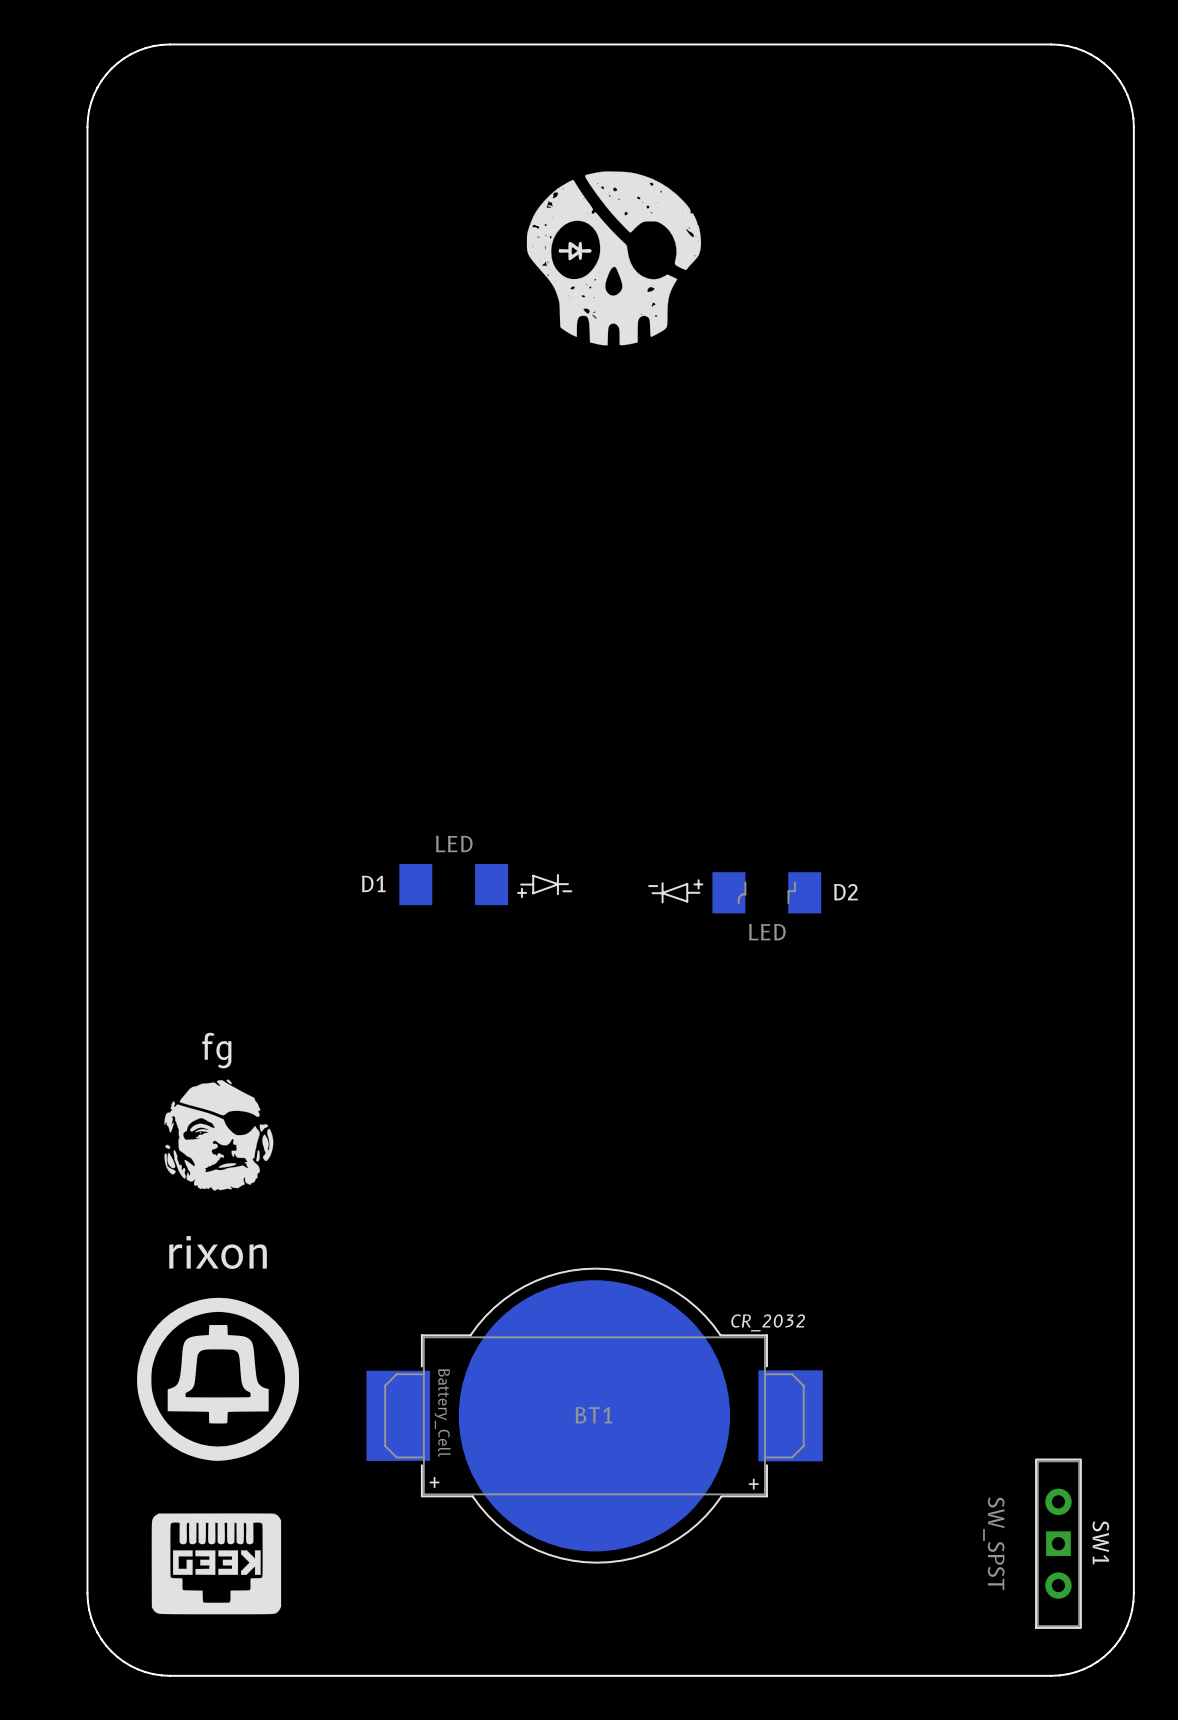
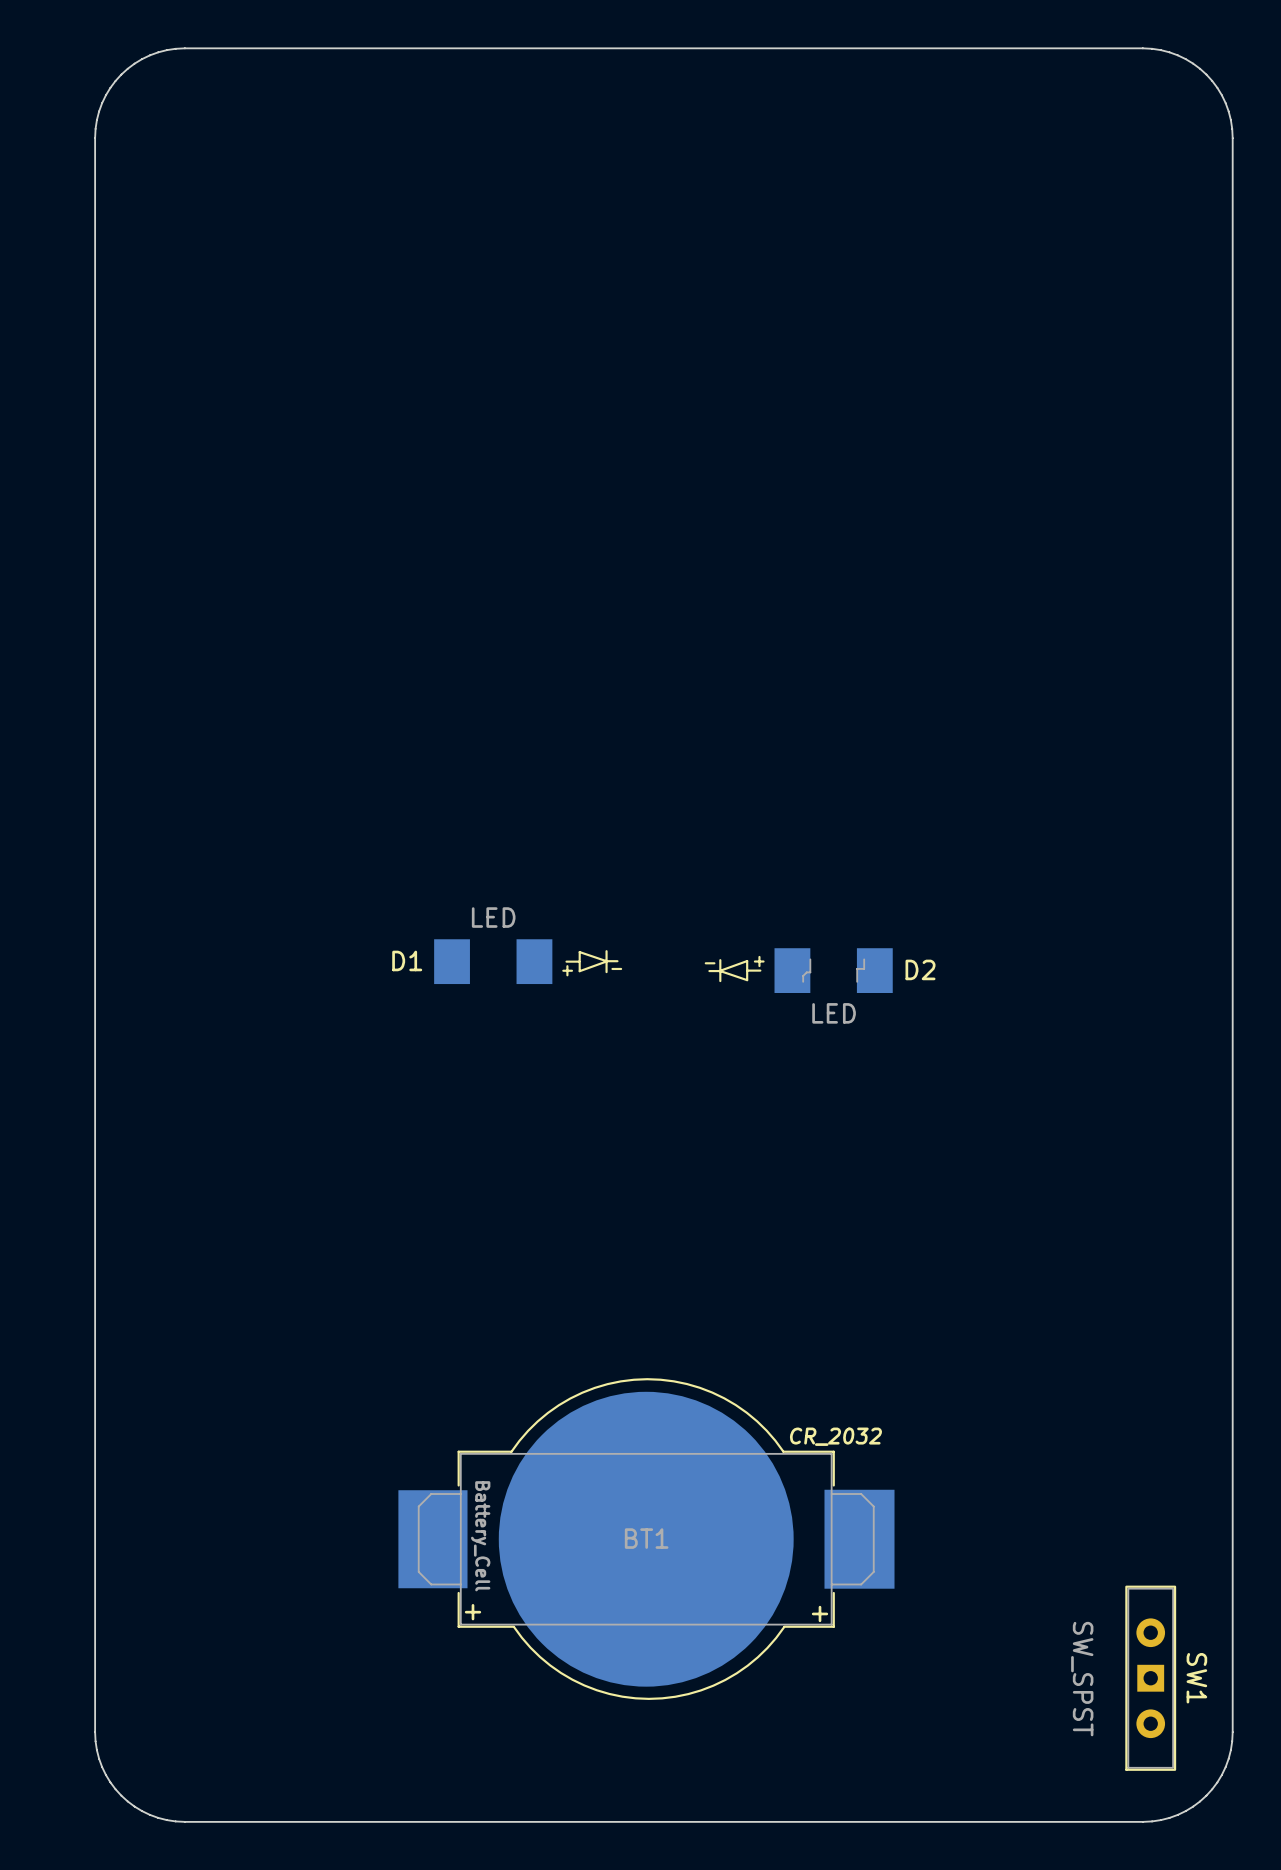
drawing: [526, 171, 702, 346] -> none
drawing: [164, 1079, 274, 1191] -> none
drawing: [137, 1297, 299, 1461] -> none
drawing: [151, 1513, 282, 1615] -> none

